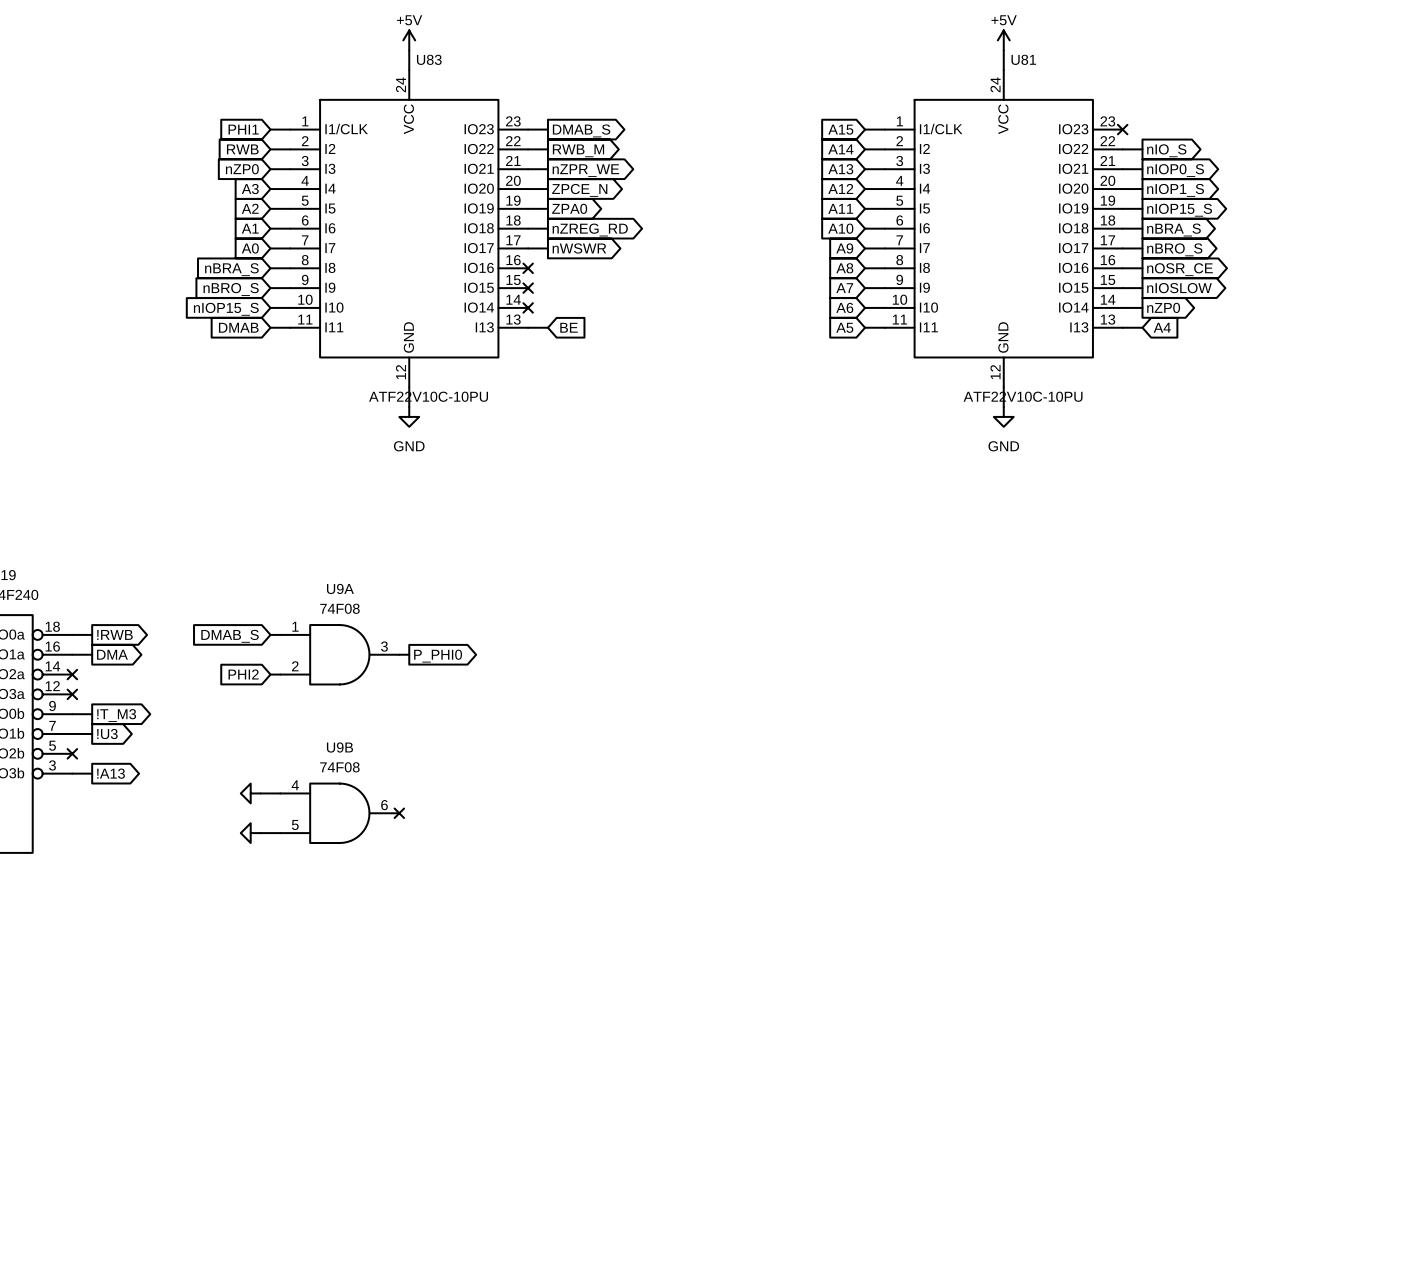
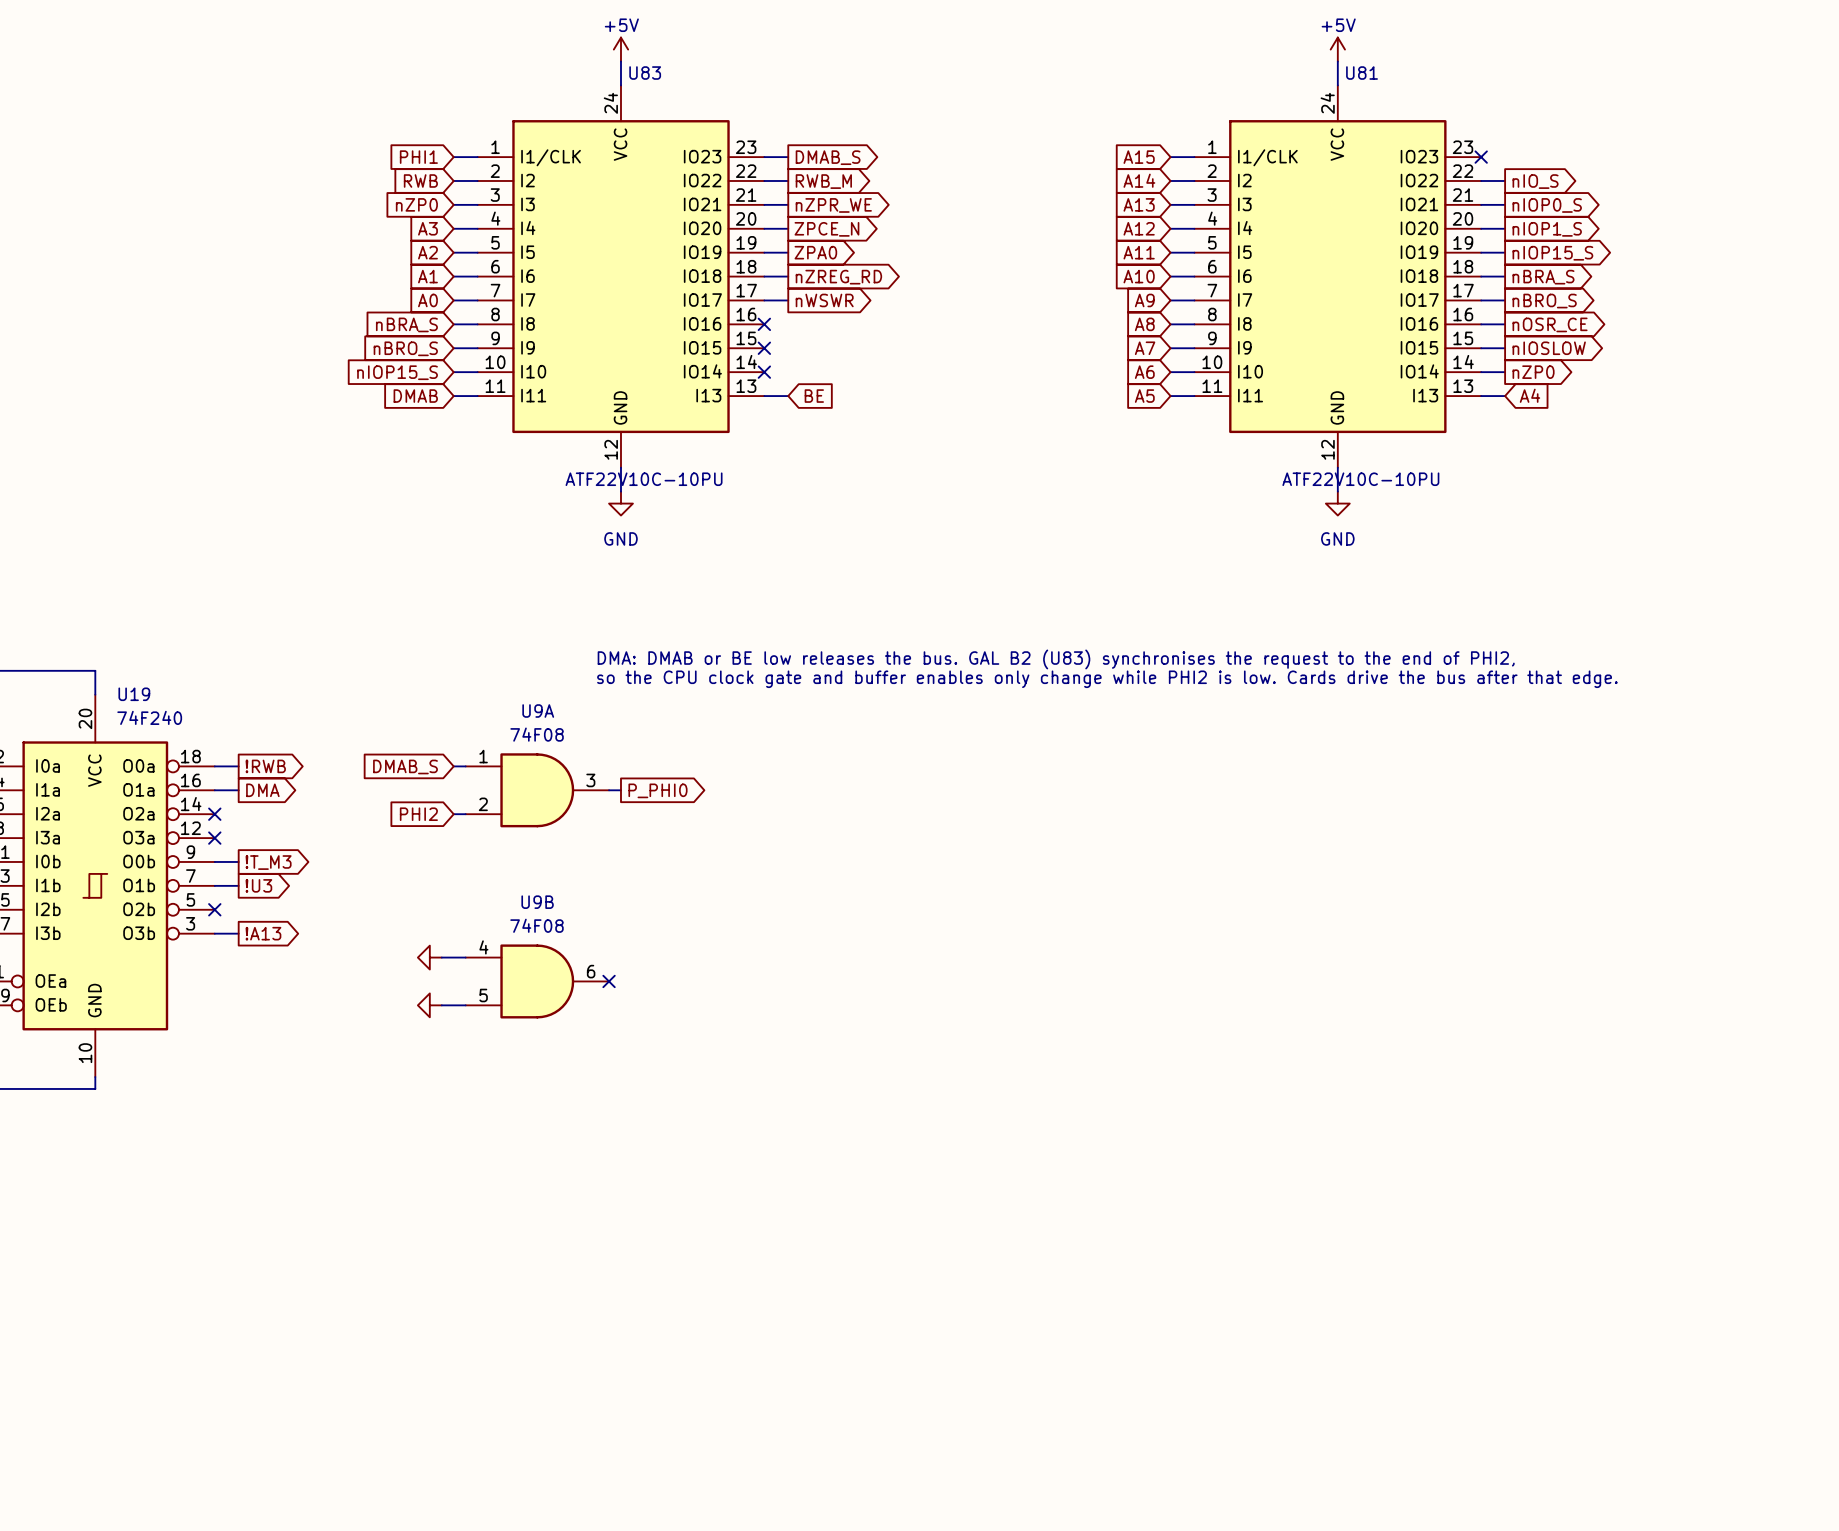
text: none -> DMA: DMAB or BE low releases the bus. GAL B2 (U83) synchronises the request to the end of PHI2, (1056, 659)
text: none -> so the CPU clock gate and buffer enables only change while PHI2 is low. Cards drive the bus after that edge. (1107, 679)

